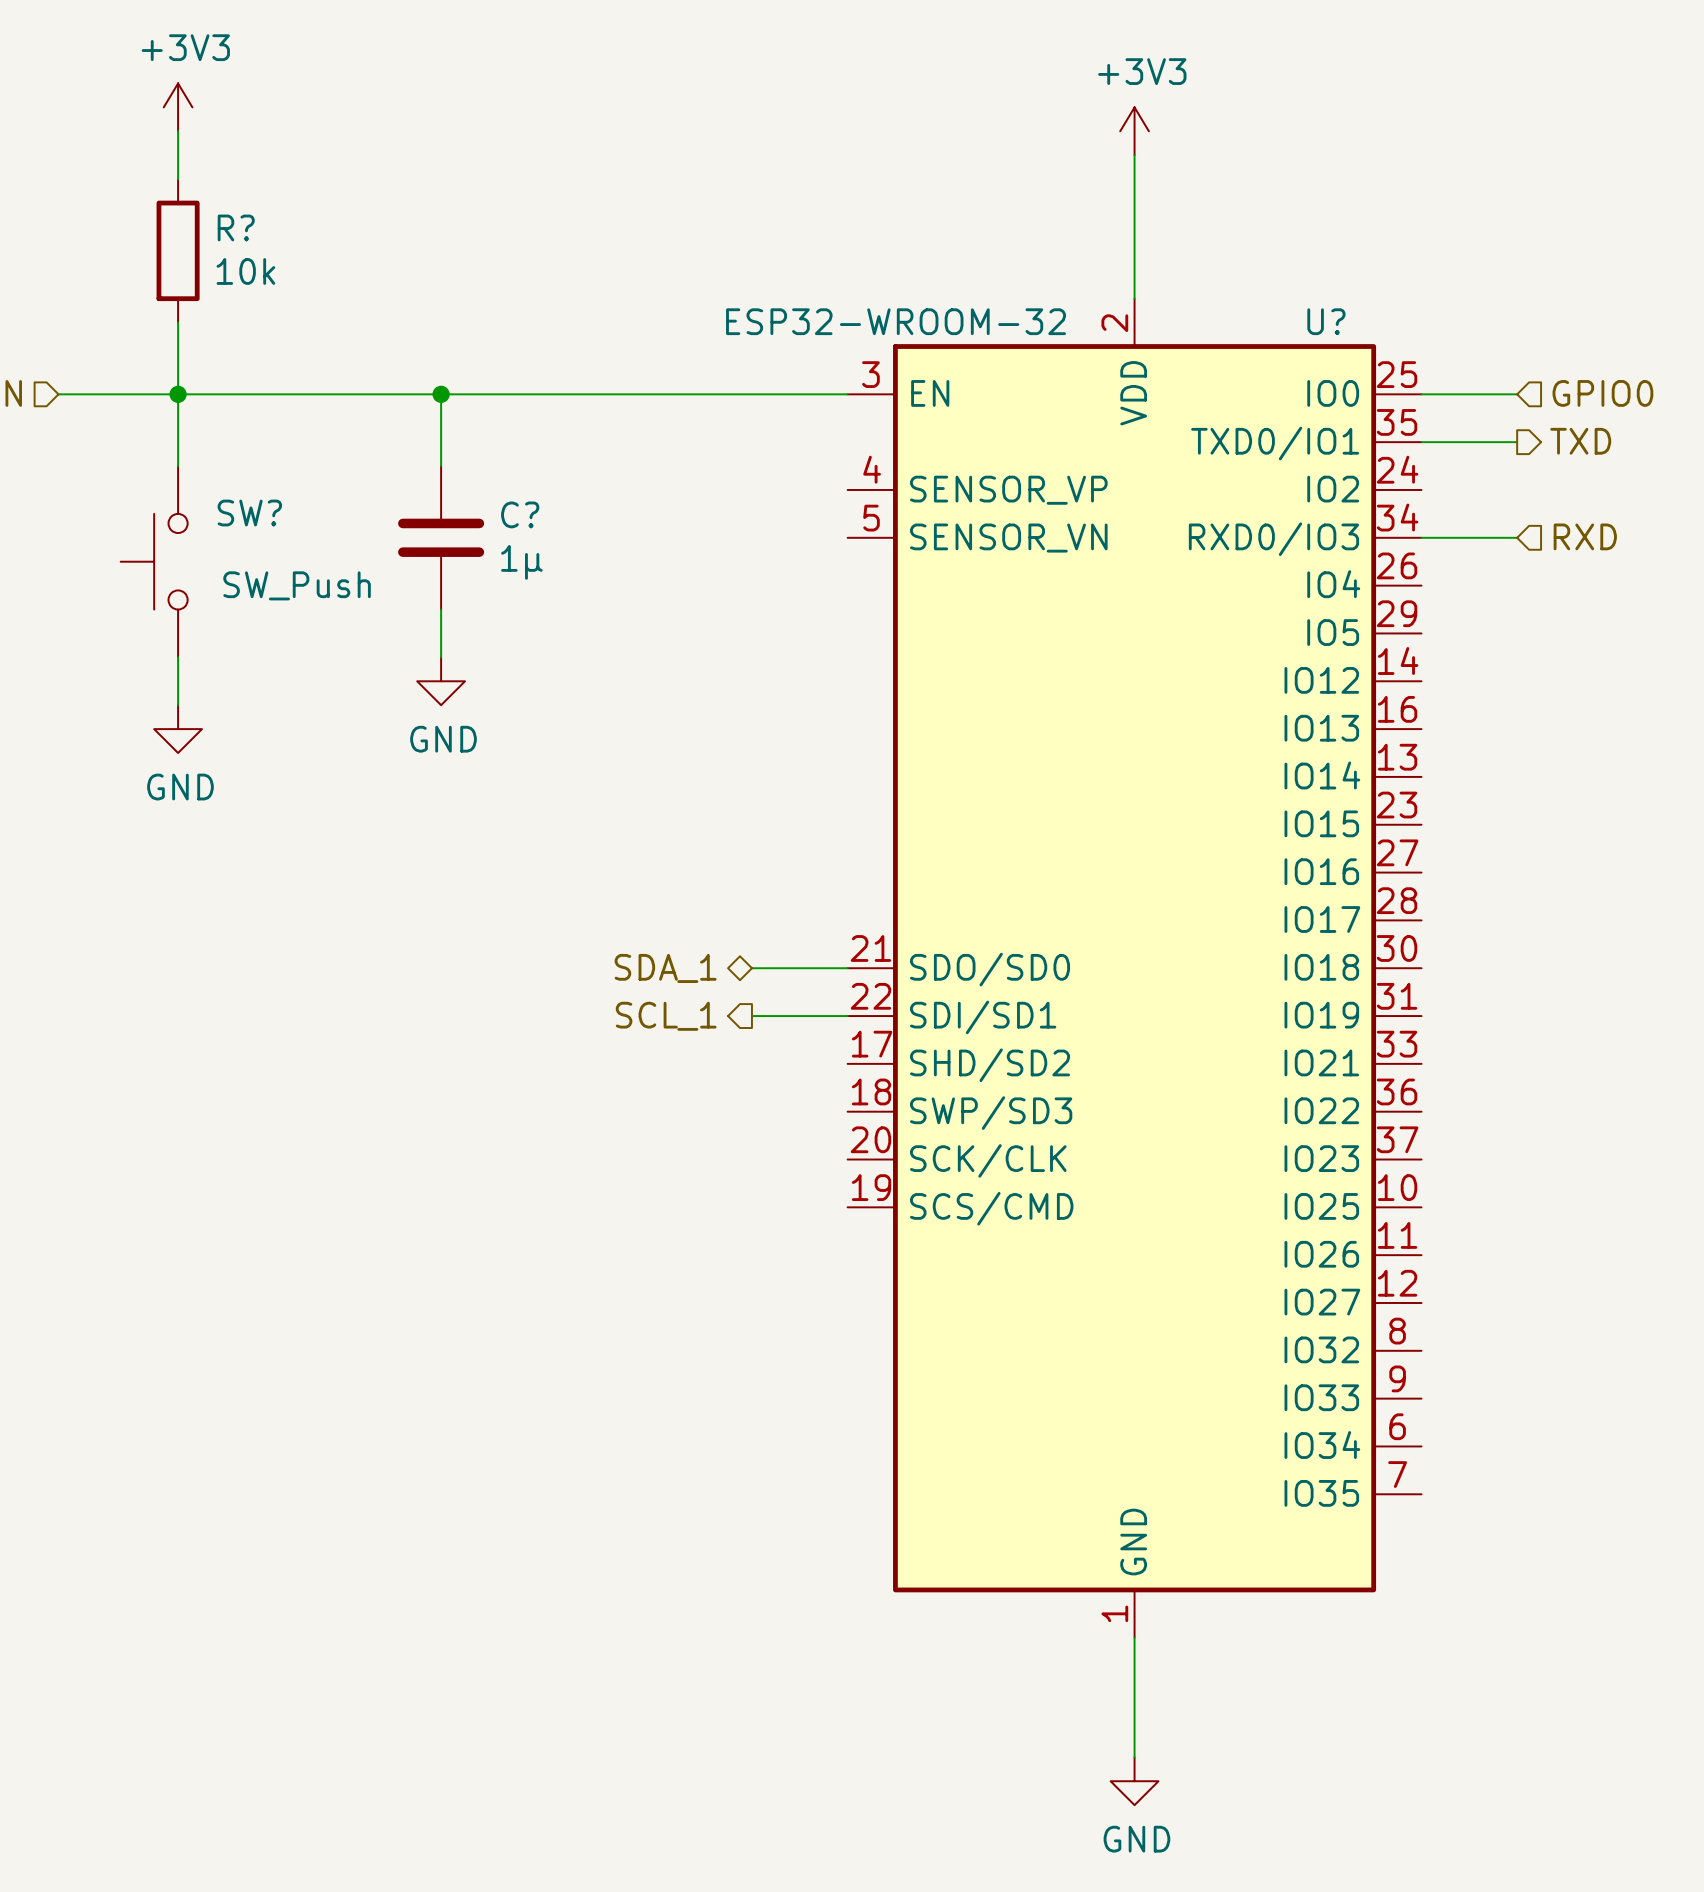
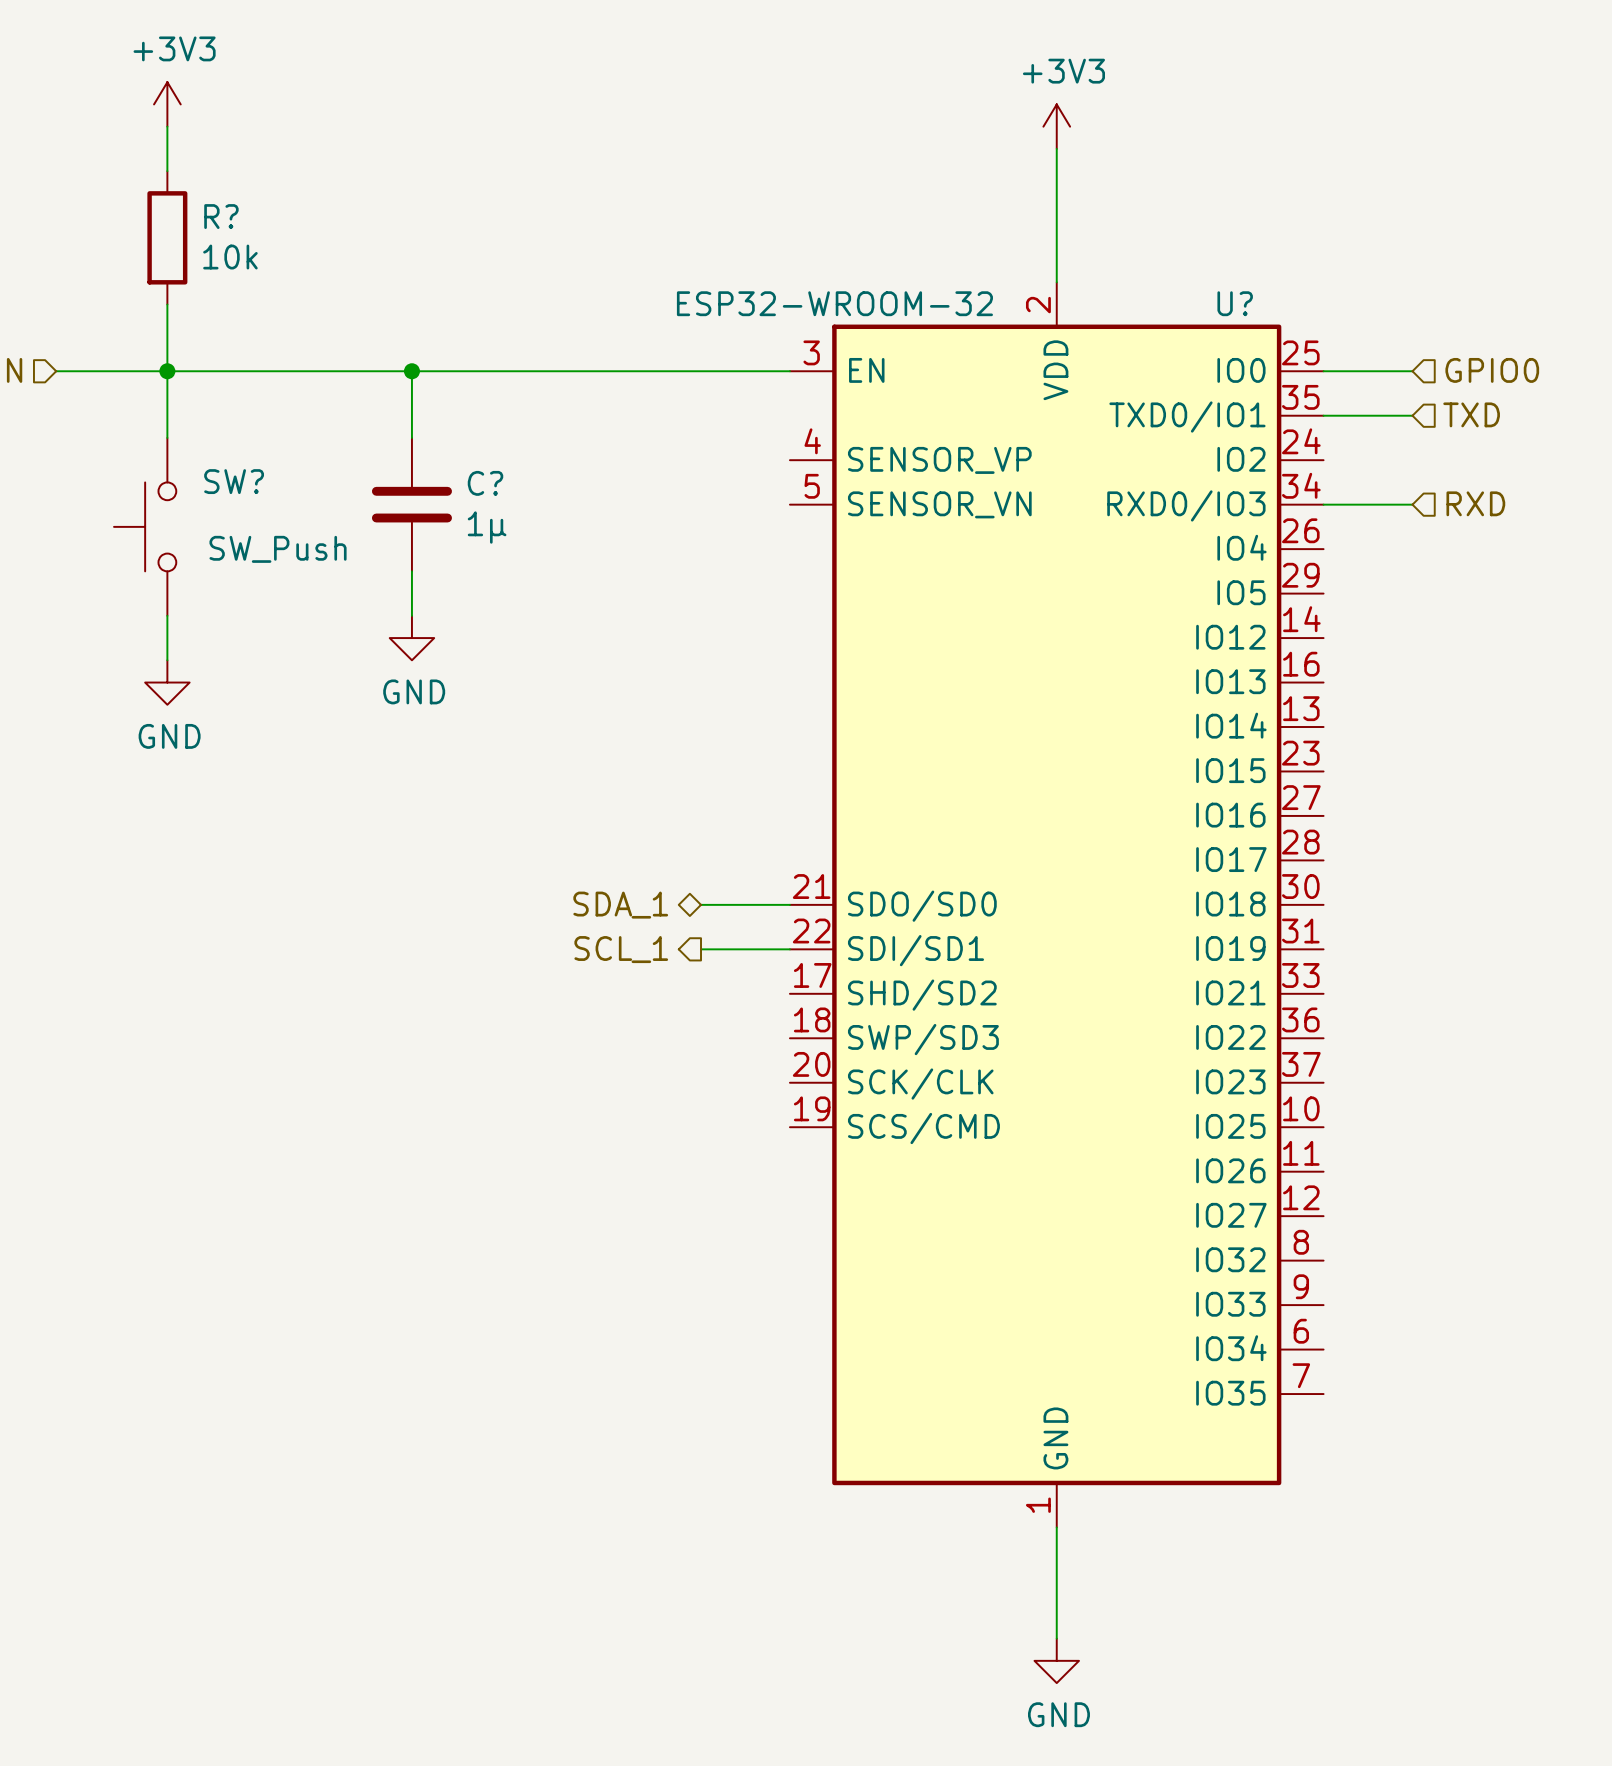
hierarchical label shape: output (1580, 441) -> input (1471, 414)

